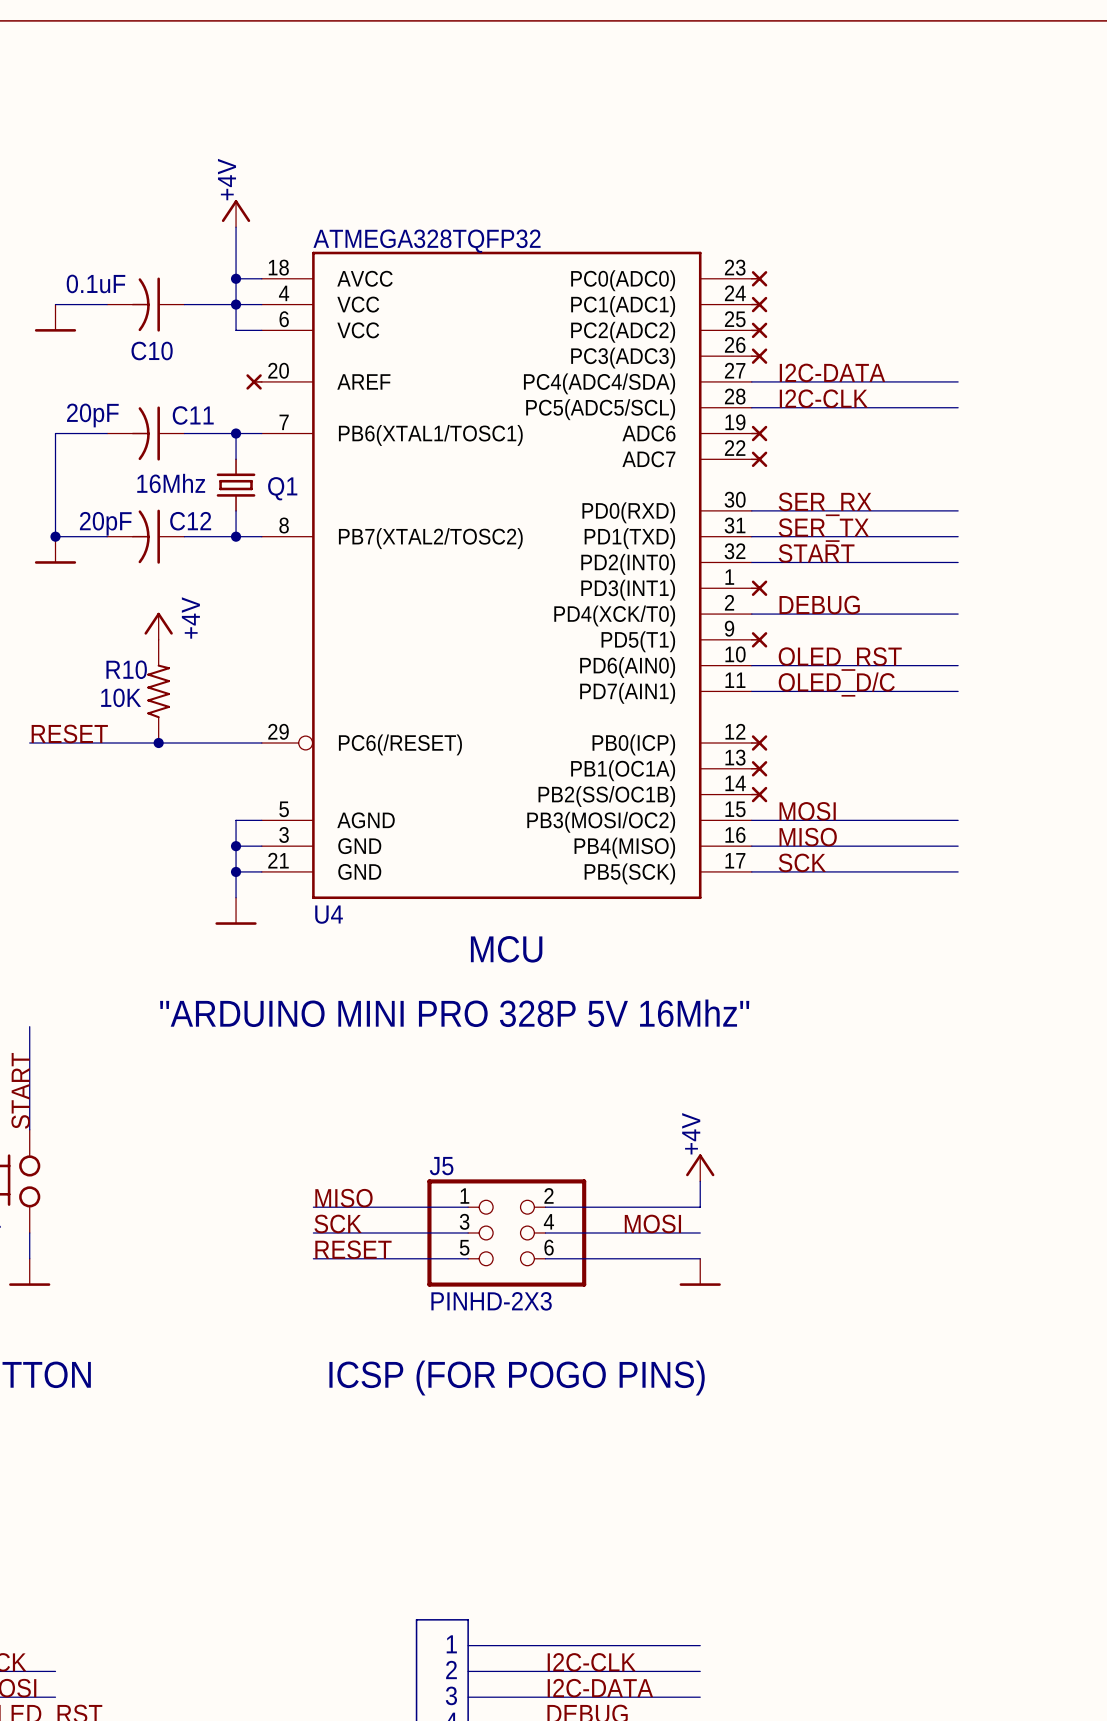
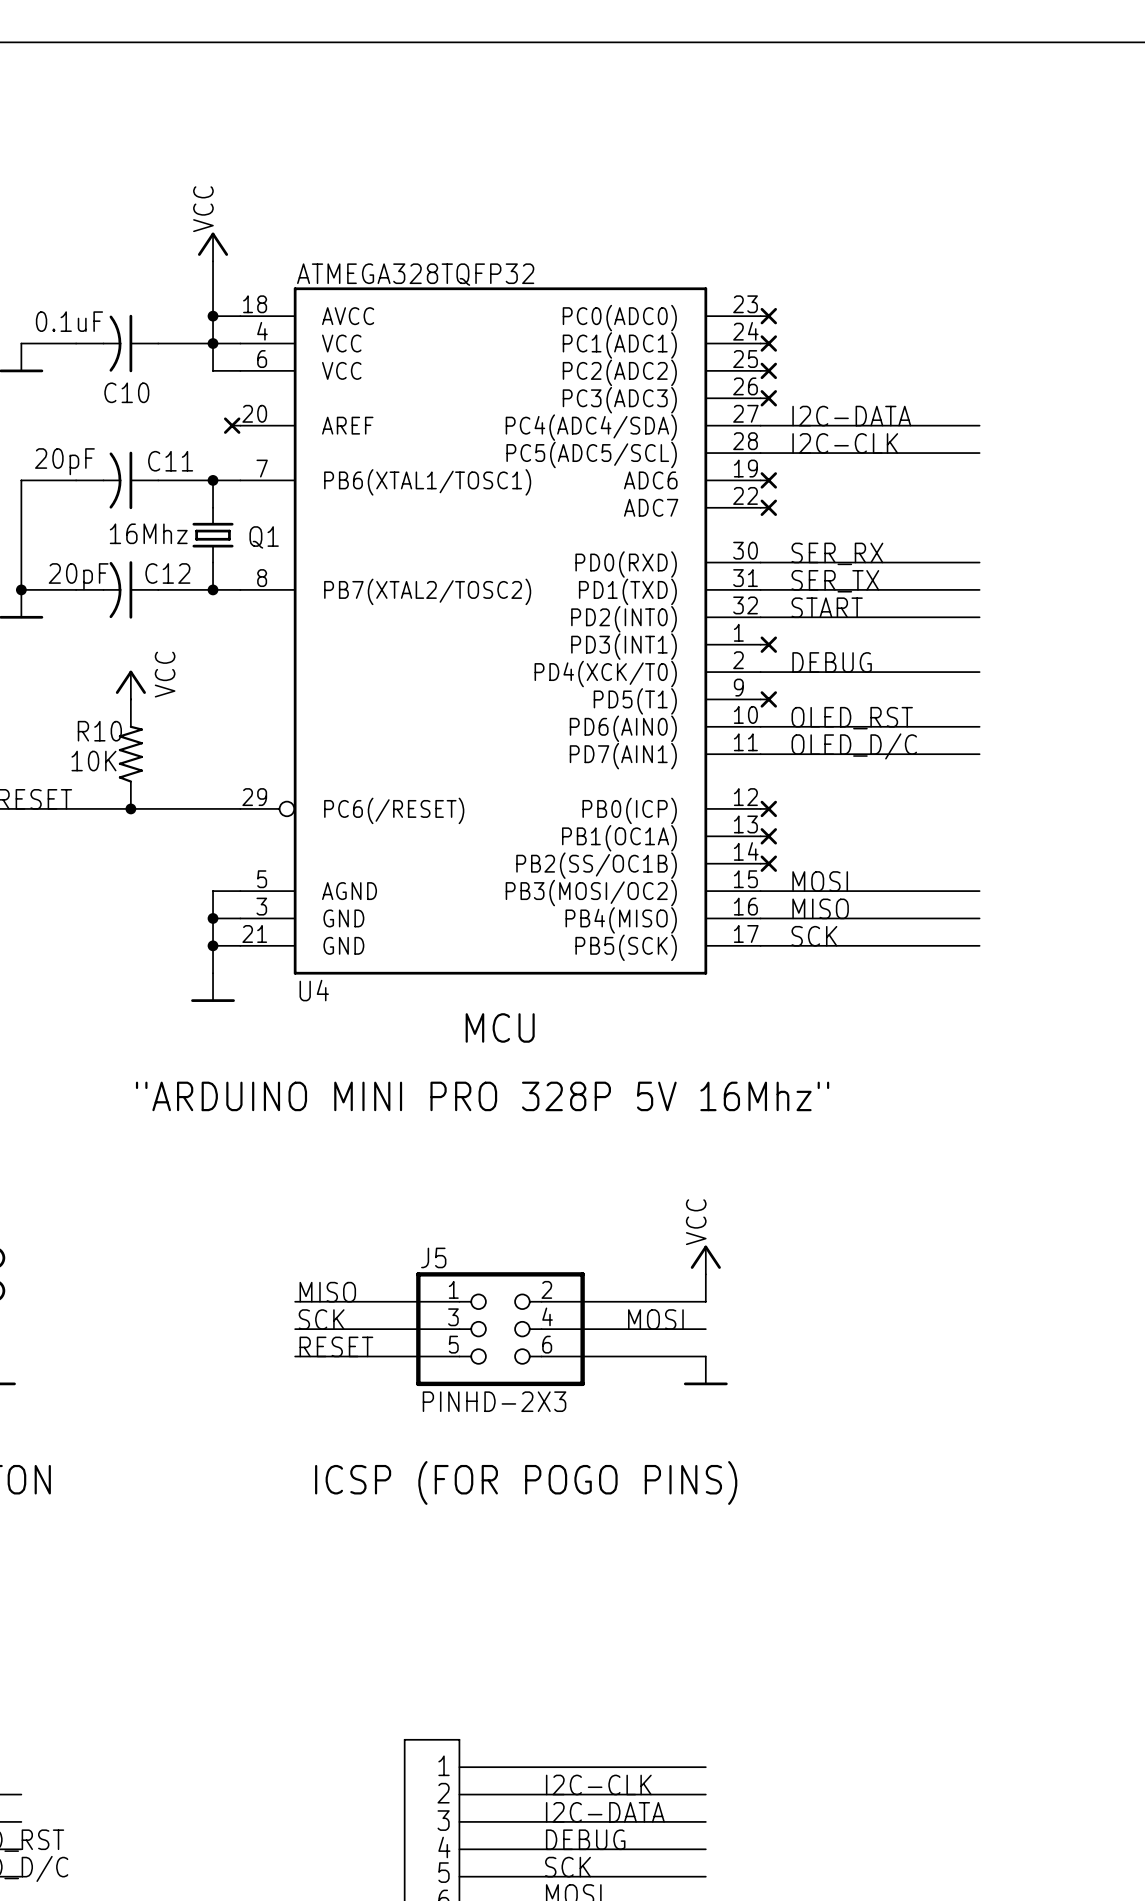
power symbol: +4V (236, 213) -> VCC (213, 247)
power symbol: +4V (158, 626) -> VCC (130, 685)
power symbol: +4V (700, 1167) -> VCC (705, 1260)

